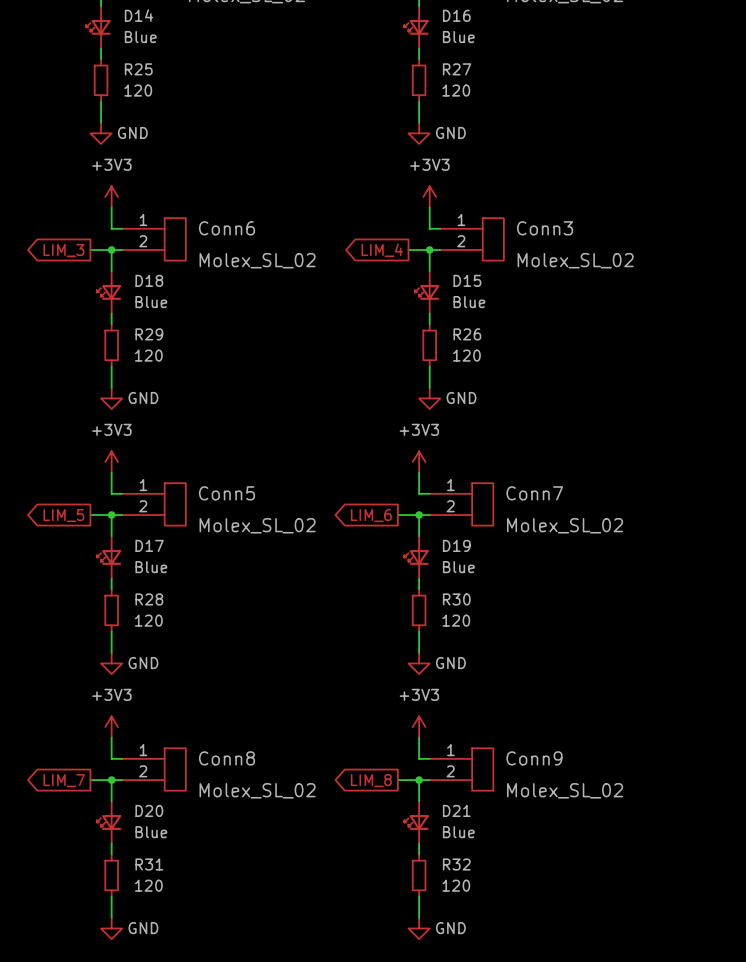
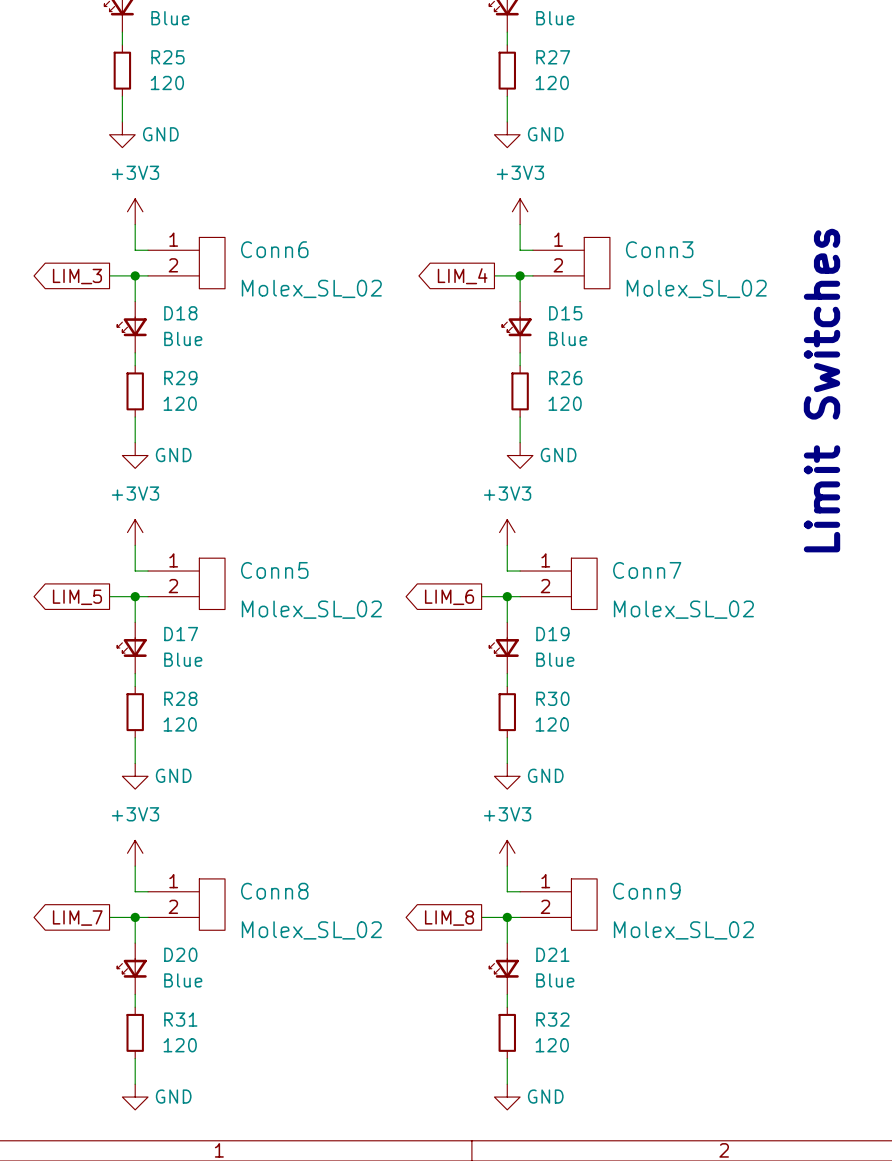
text: none -> Limit Switches (822, 390)

